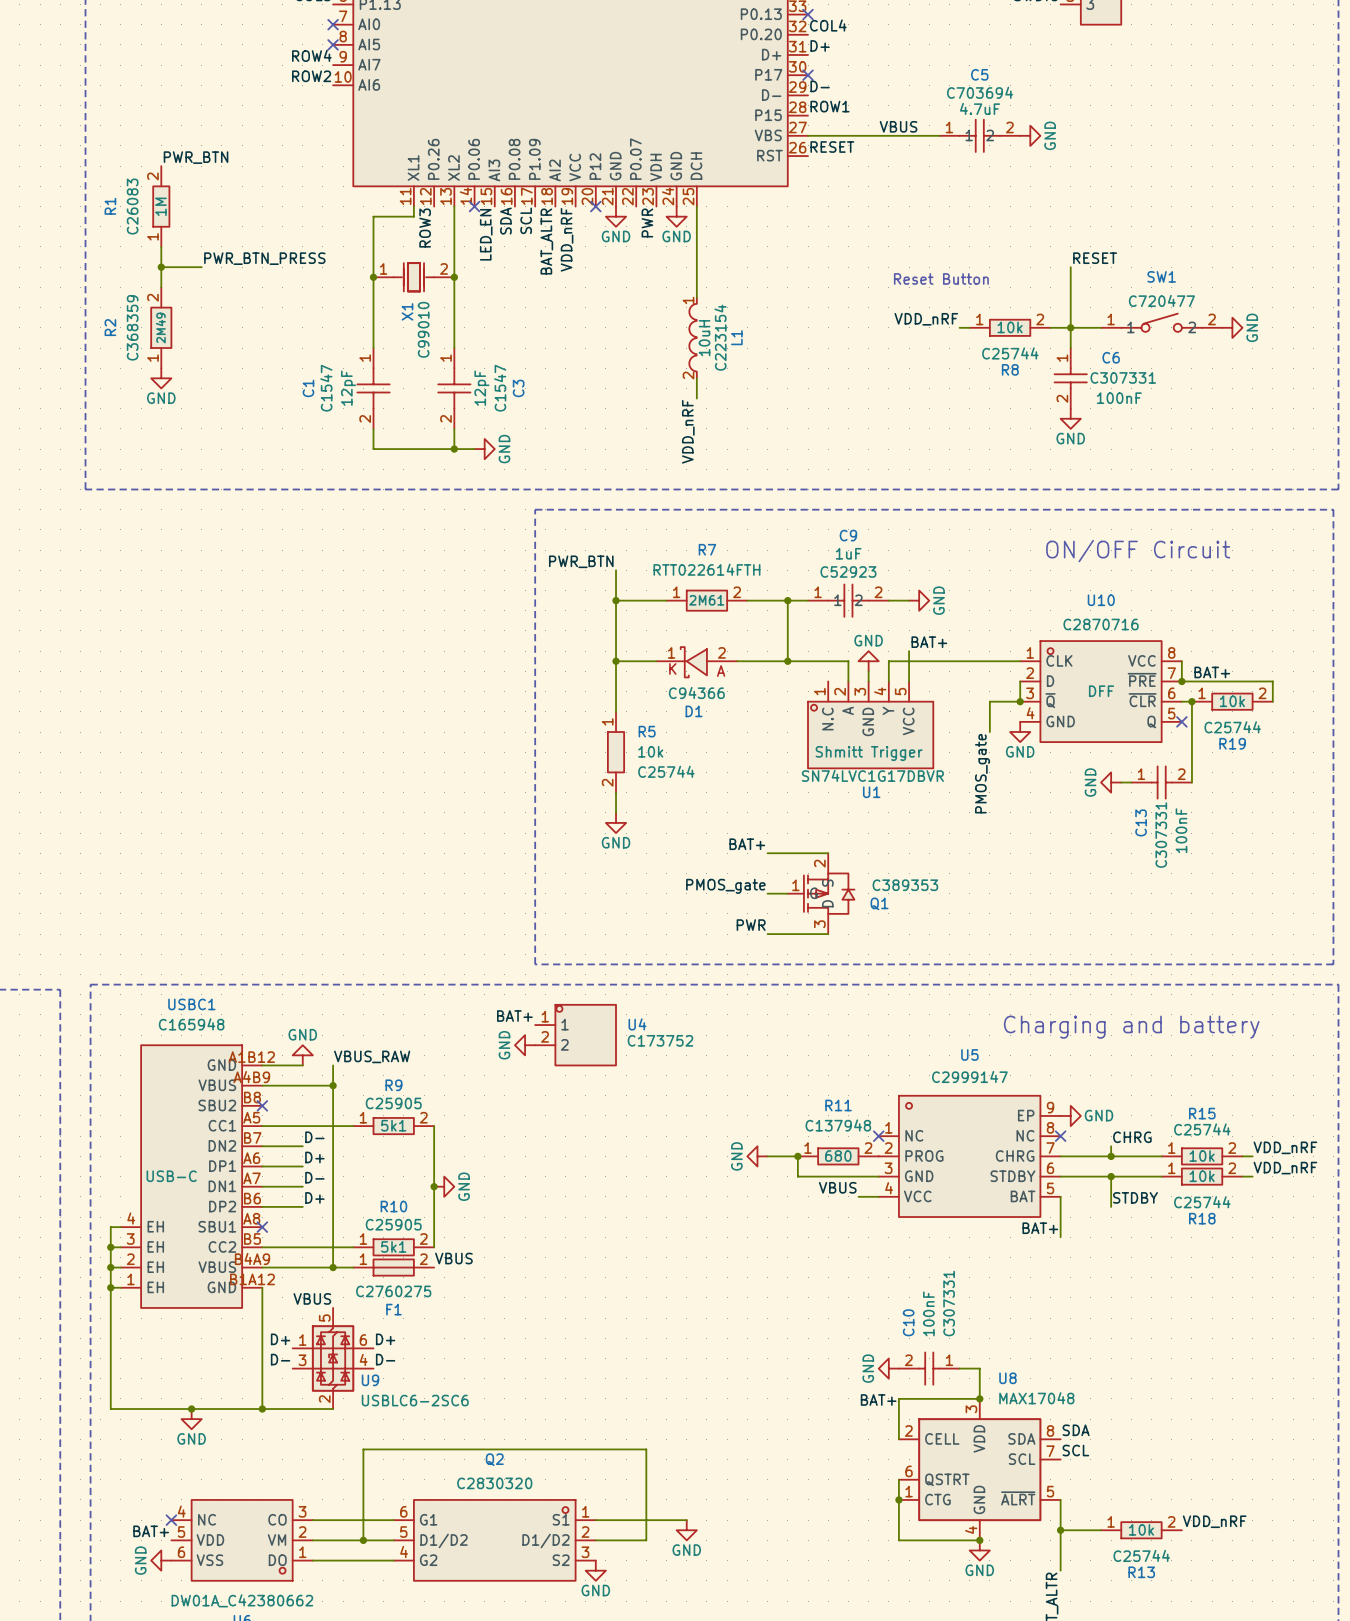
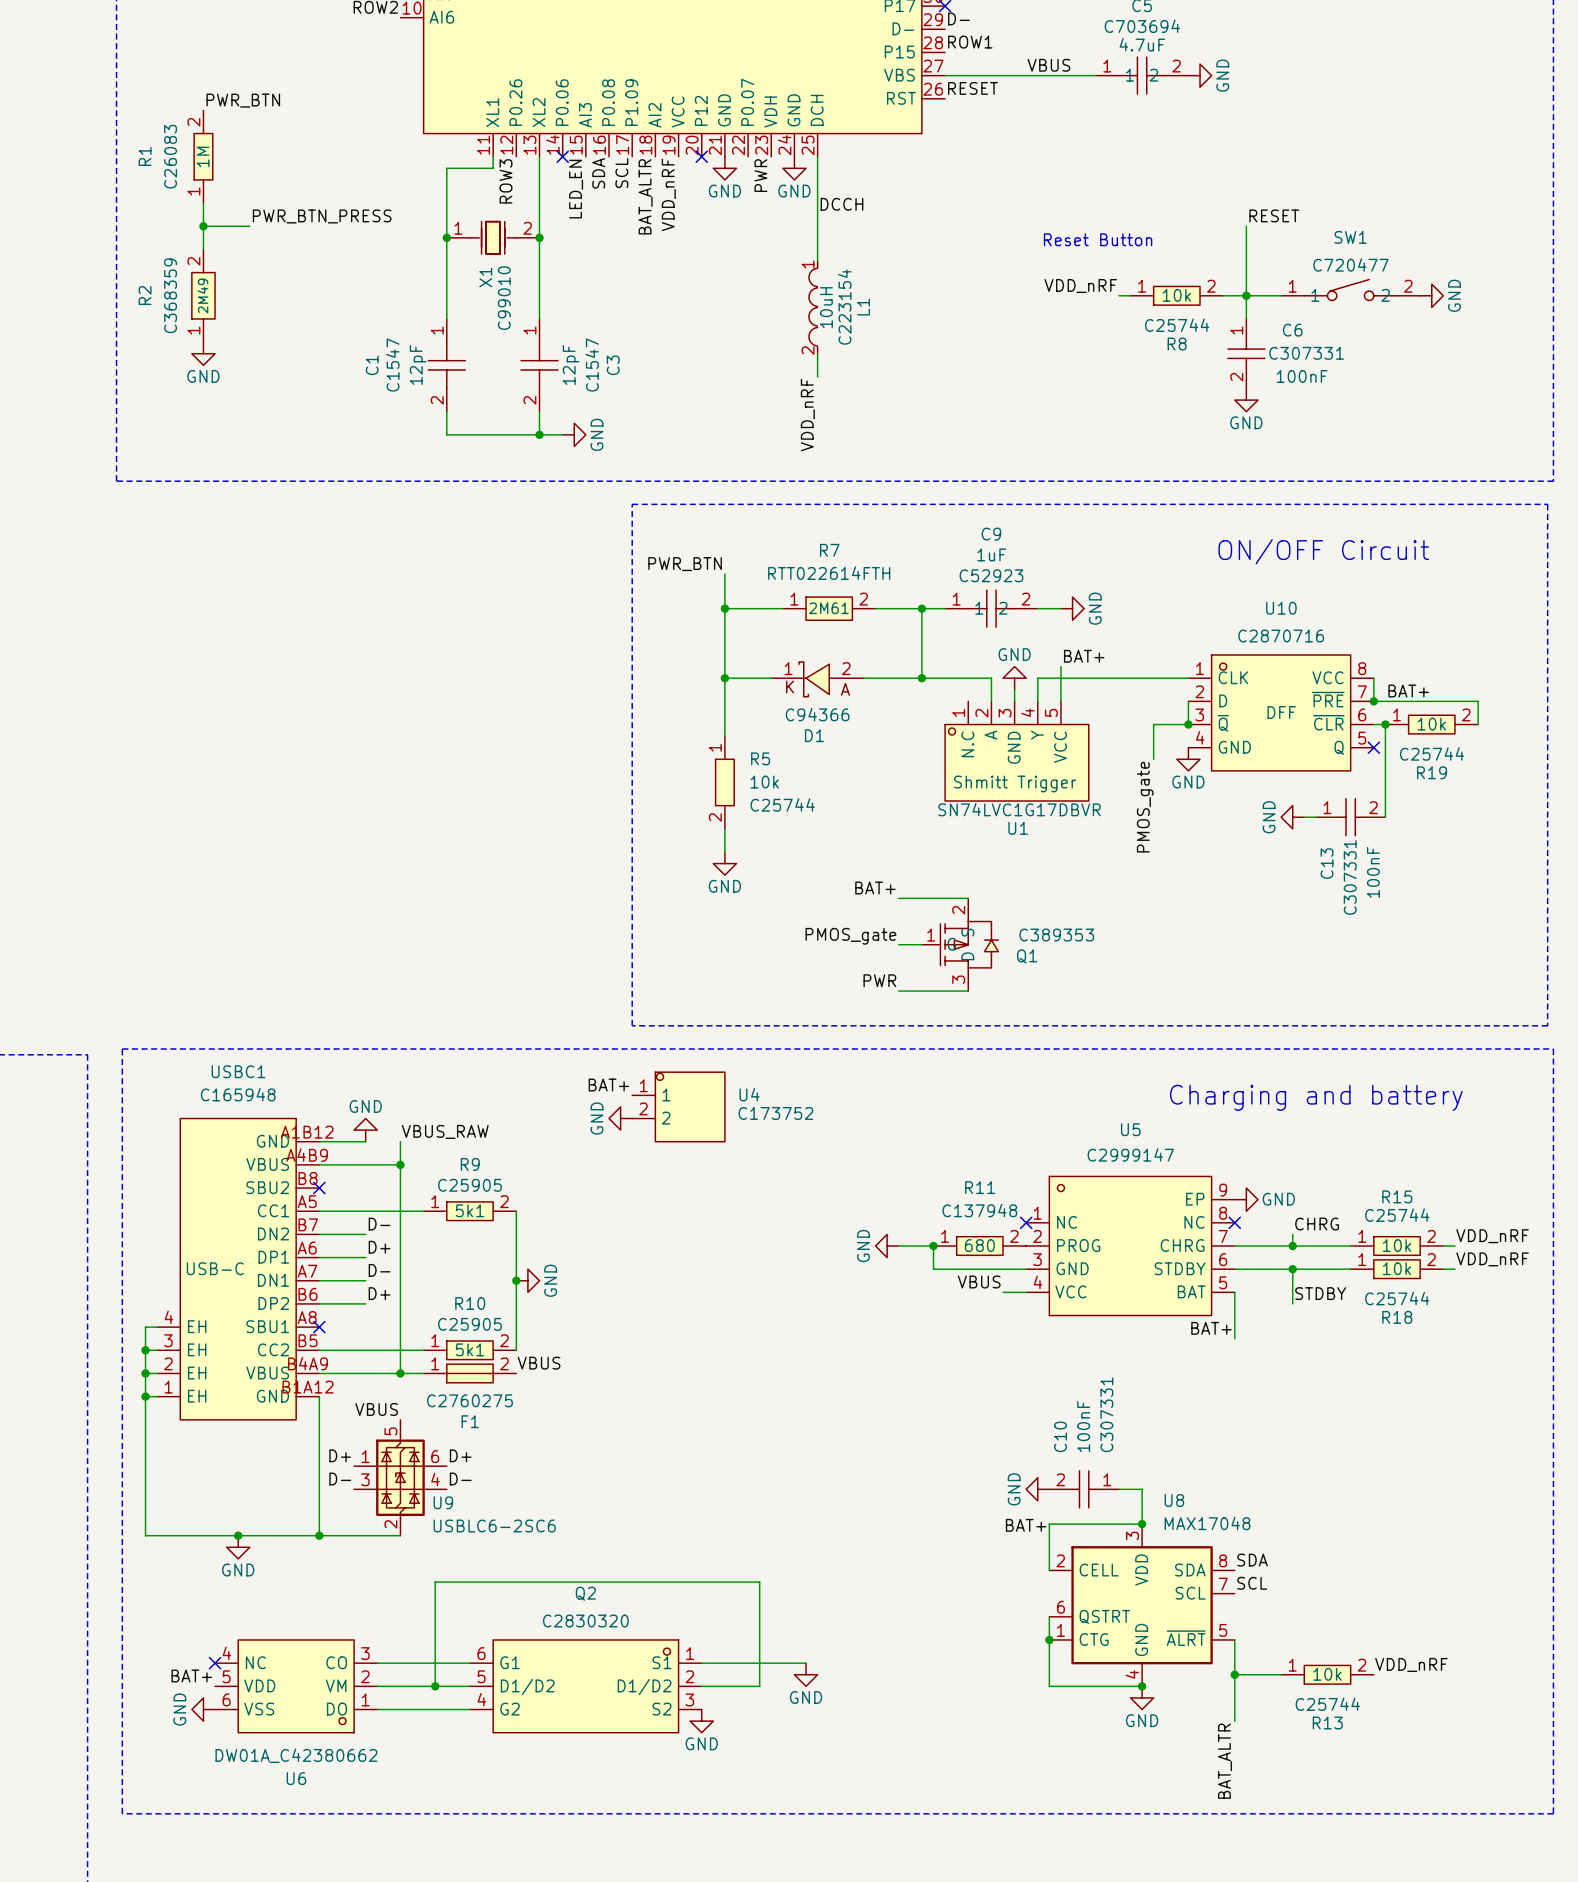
label: none -> DCCH (841, 204)

